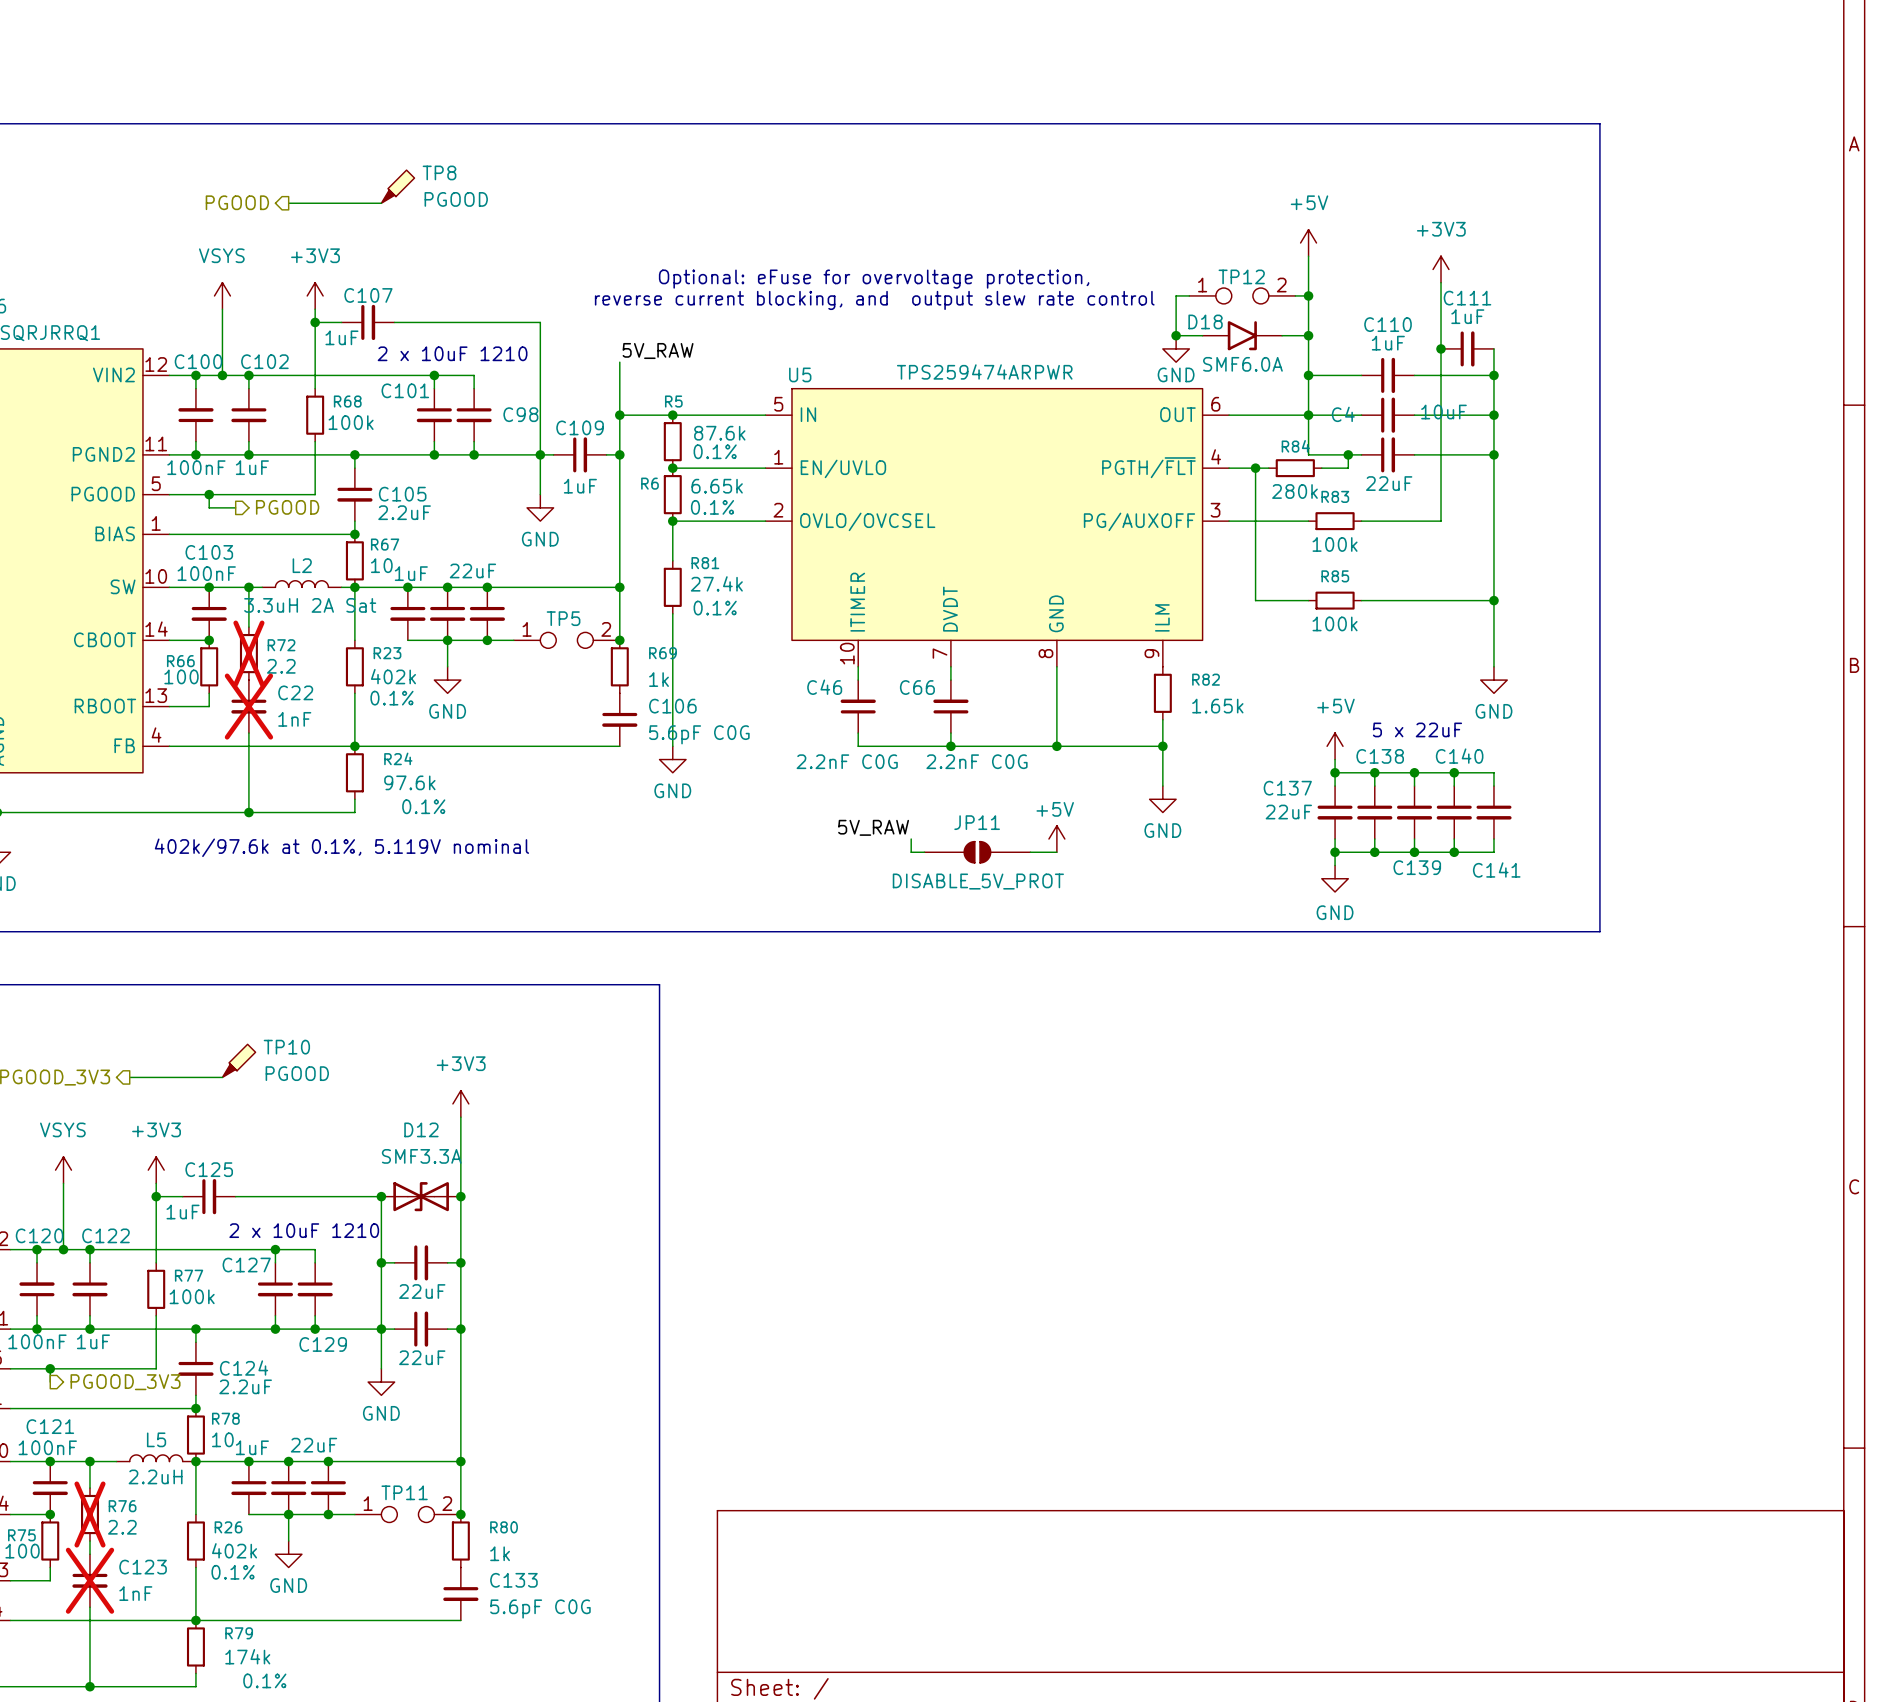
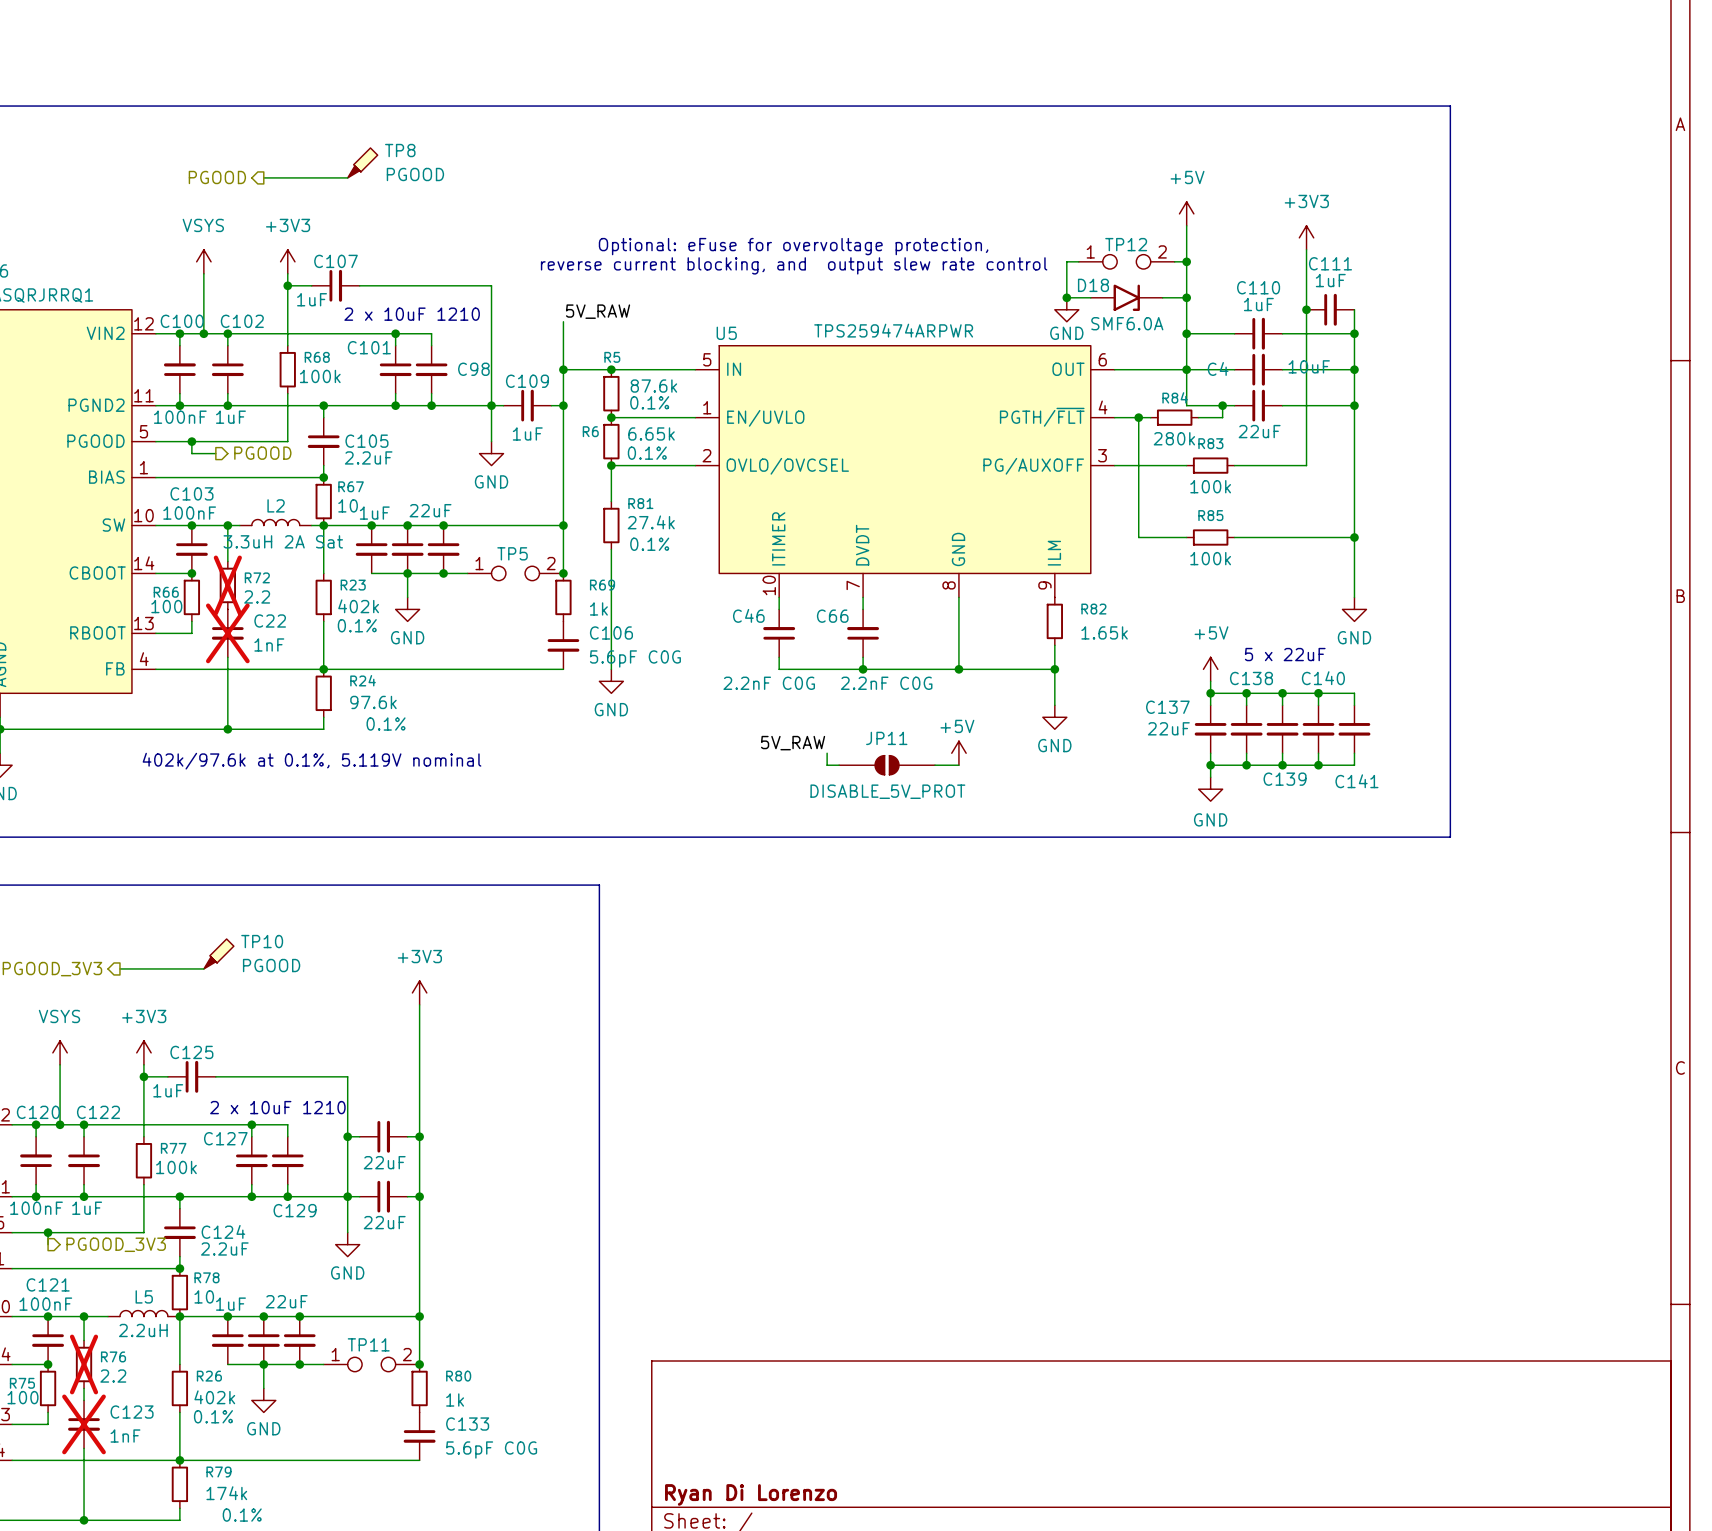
junction: (381, 1196) -> none
D12: SMF3.3A (421, 1196) -> none
junction: (460, 1196) -> none
title block: none -> Ryan Di Lorenzo (751, 1494)

